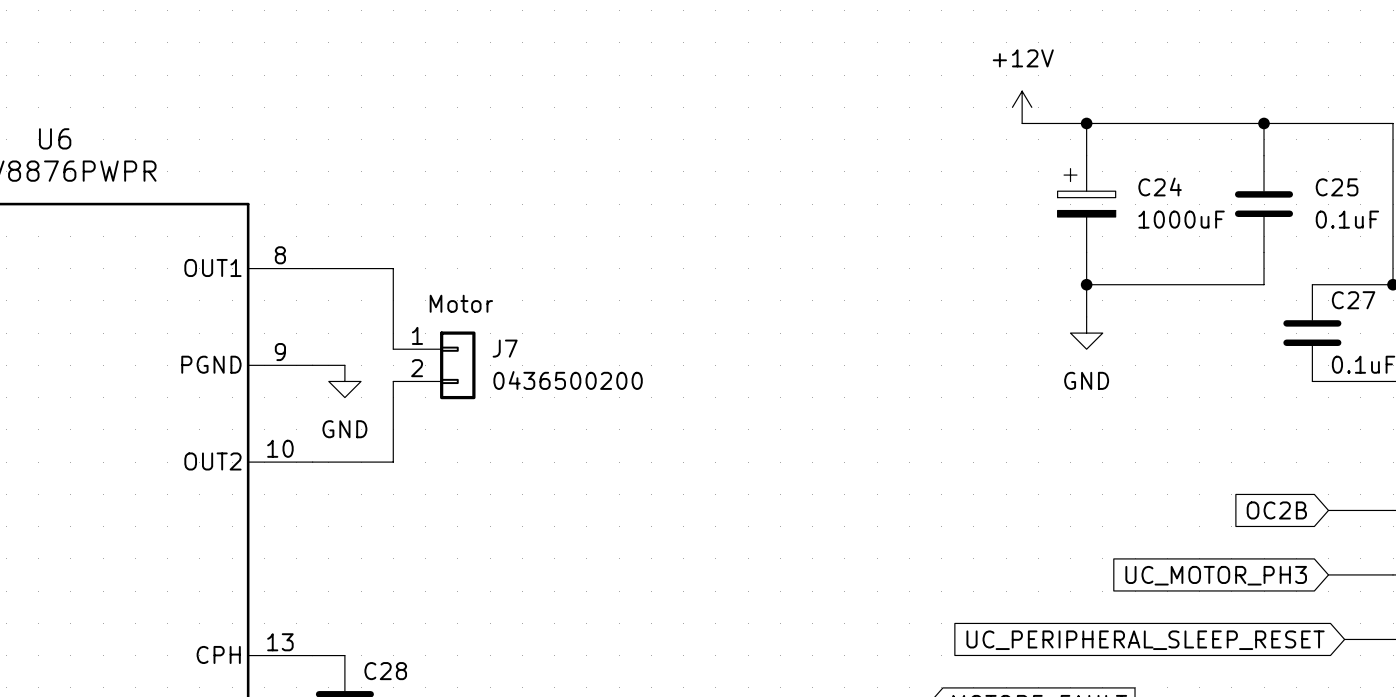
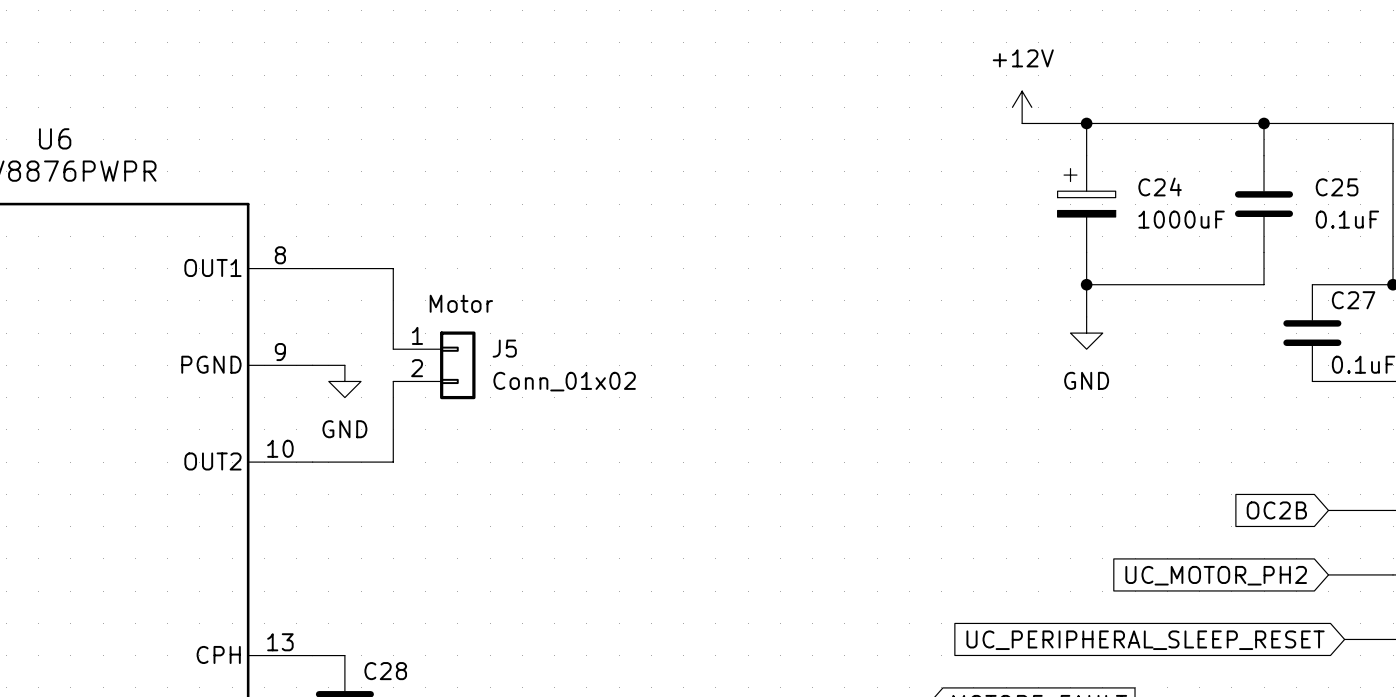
J7 name: J7 (505, 348) -> J5 (504, 348)
J7 value: 0436500200 (568, 380) -> Conn_01x02 (564, 381)
global label: UC_MOTOR_PH3 (1216, 575) -> UC_MOTOR_PH2 (1216, 575)

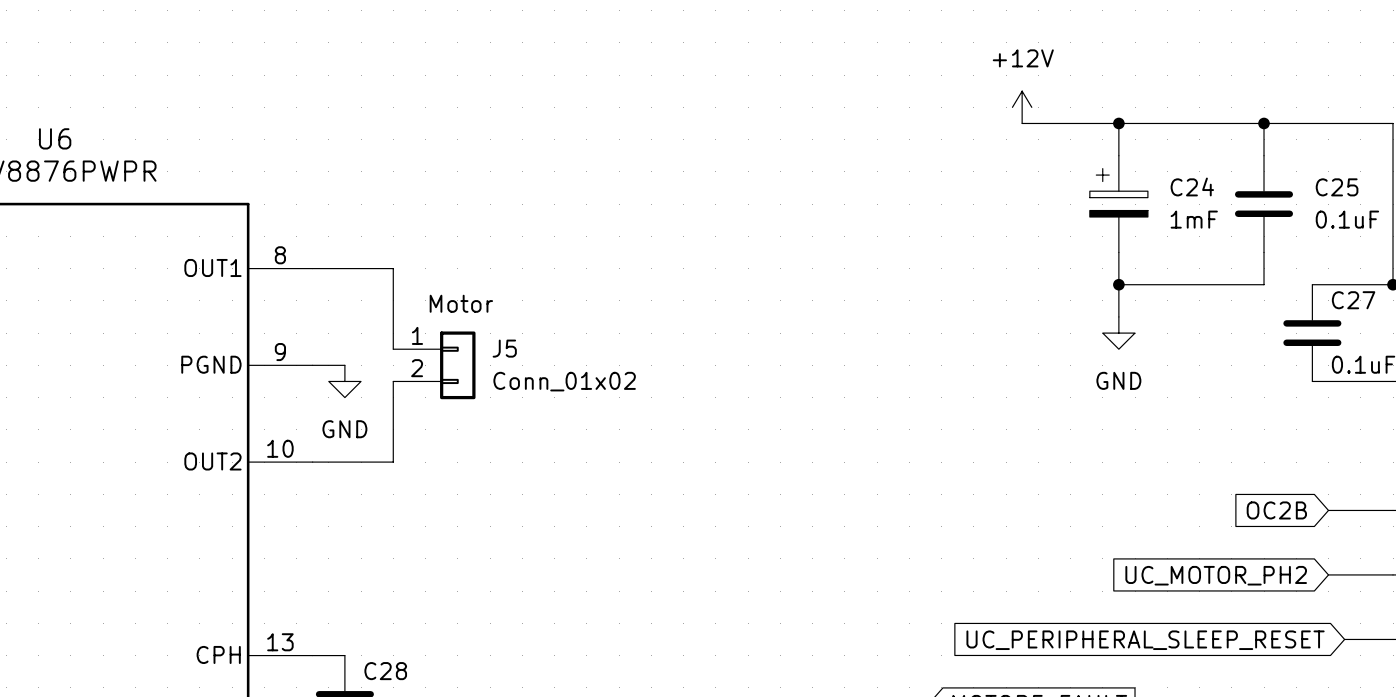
wire: (1086, 123) (1086, 155) -> (1118, 123) (1118, 155)
junction position: (1086, 123) -> (1118, 123)
C24 position: (1086, 204) -> (1118, 204)
C24 value: 1000uF (1181, 219) -> 1mF (1194, 219)
wire: (1086, 252) (1086, 316) -> (1118, 252) (1118, 316)
wire: (1086, 284) (1118, 284) -> none
junction position: (1086, 284) -> (1118, 284)
power symbol position: GND (1086, 333) -> GND (1118, 333)

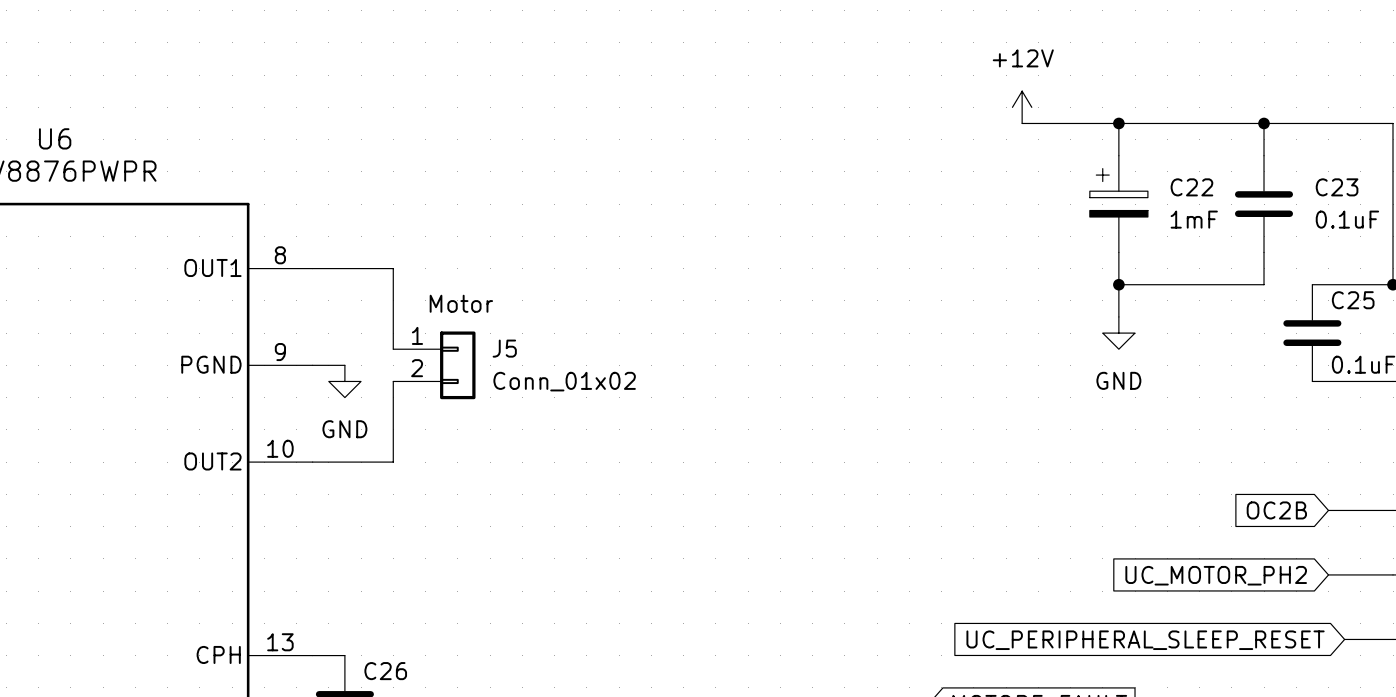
C24 name: C24 (1192, 186) -> C22 (1191, 187)
C25 name: C25 (1337, 187) -> C23 (1337, 187)
C27 name: C27 (1353, 300) -> C25 (1353, 300)
C28 name: C28 (385, 671) -> C26 (385, 671)

